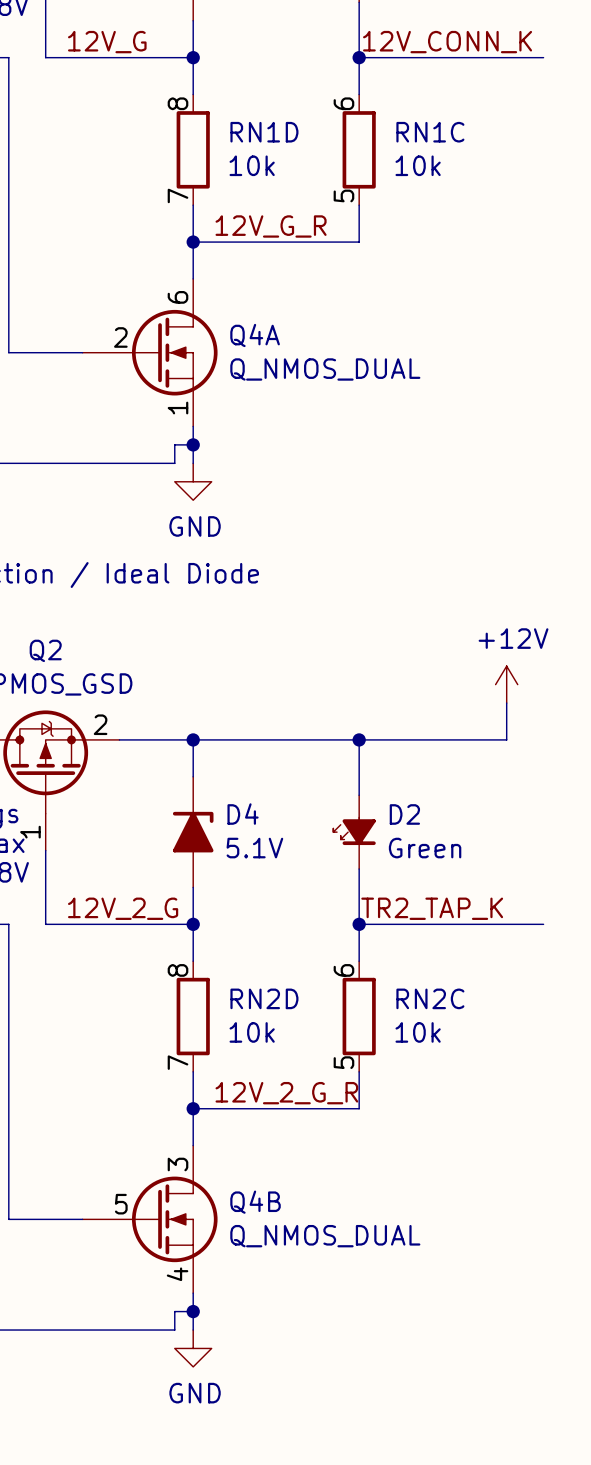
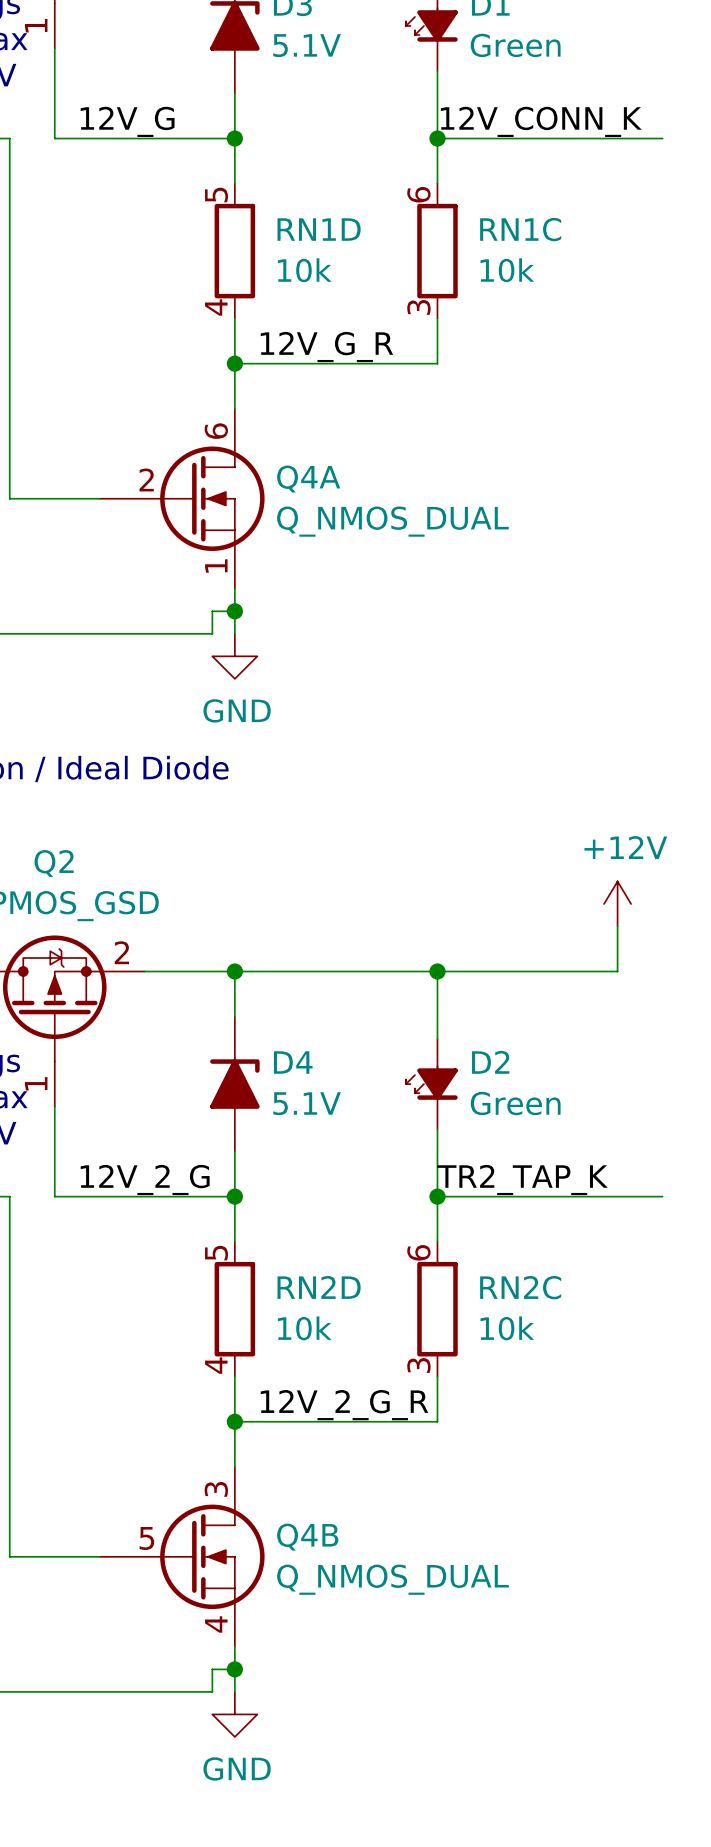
RN1D pin number: 8 (177, 103) -> 5 (216, 194)
RN1D pin number: 7 (177, 195) -> 4 (216, 307)
RN1C pin number: 5 (343, 195) -> 3 (418, 307)
RN2D pin number: 8 (177, 970) -> 5 (216, 1253)
RN2D pin number: 7 (177, 1062) -> 4 (216, 1365)
RN2C pin number: 5 (343, 1062) -> 3 (418, 1365)

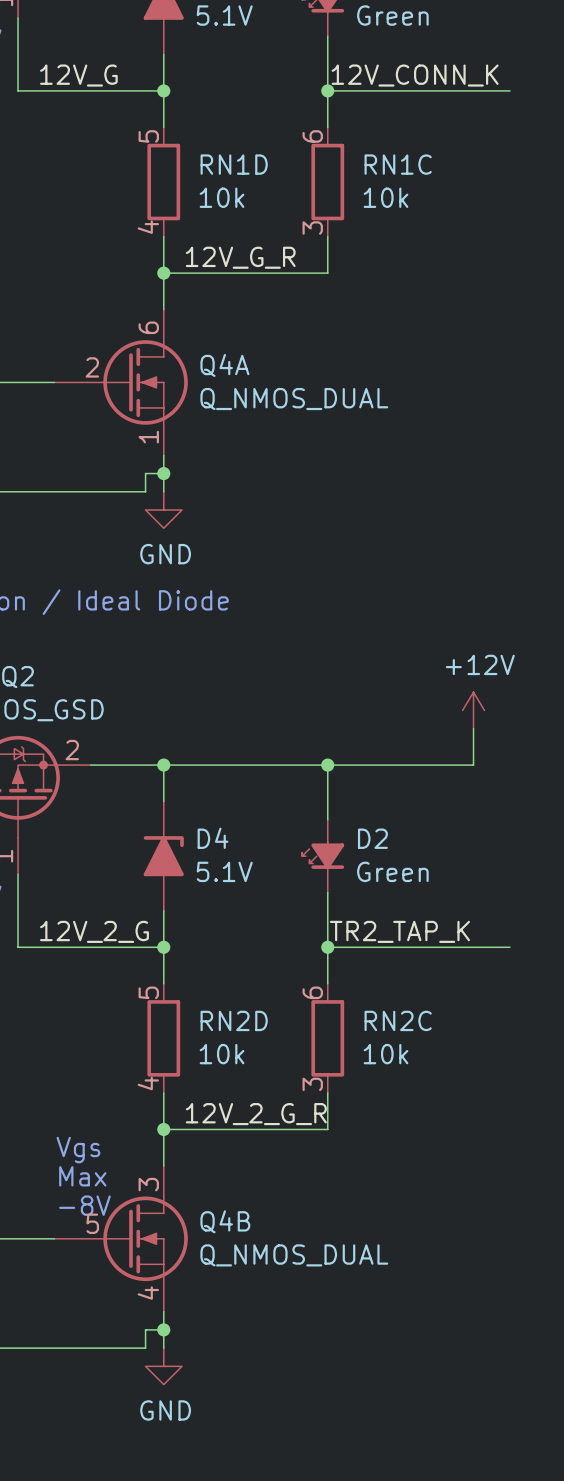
text: none -> Vgs (78, 1150)
text: none -> Max (82, 1176)
text: none -> -8V (84, 1205)

